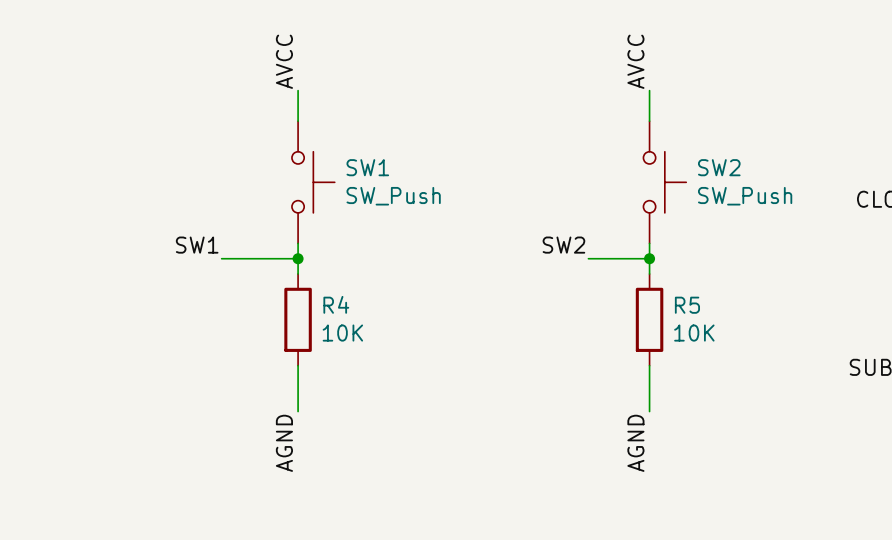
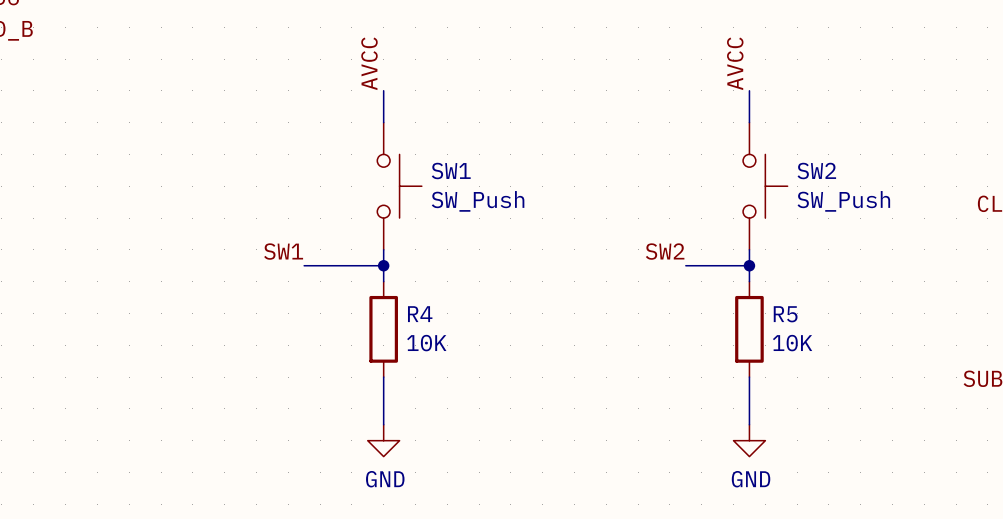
power symbol: none -> GND (383, 440)
power symbol: none -> GND (749, 440)
label: AGND (284, 443) -> none
label: AGND (635, 443) -> none

